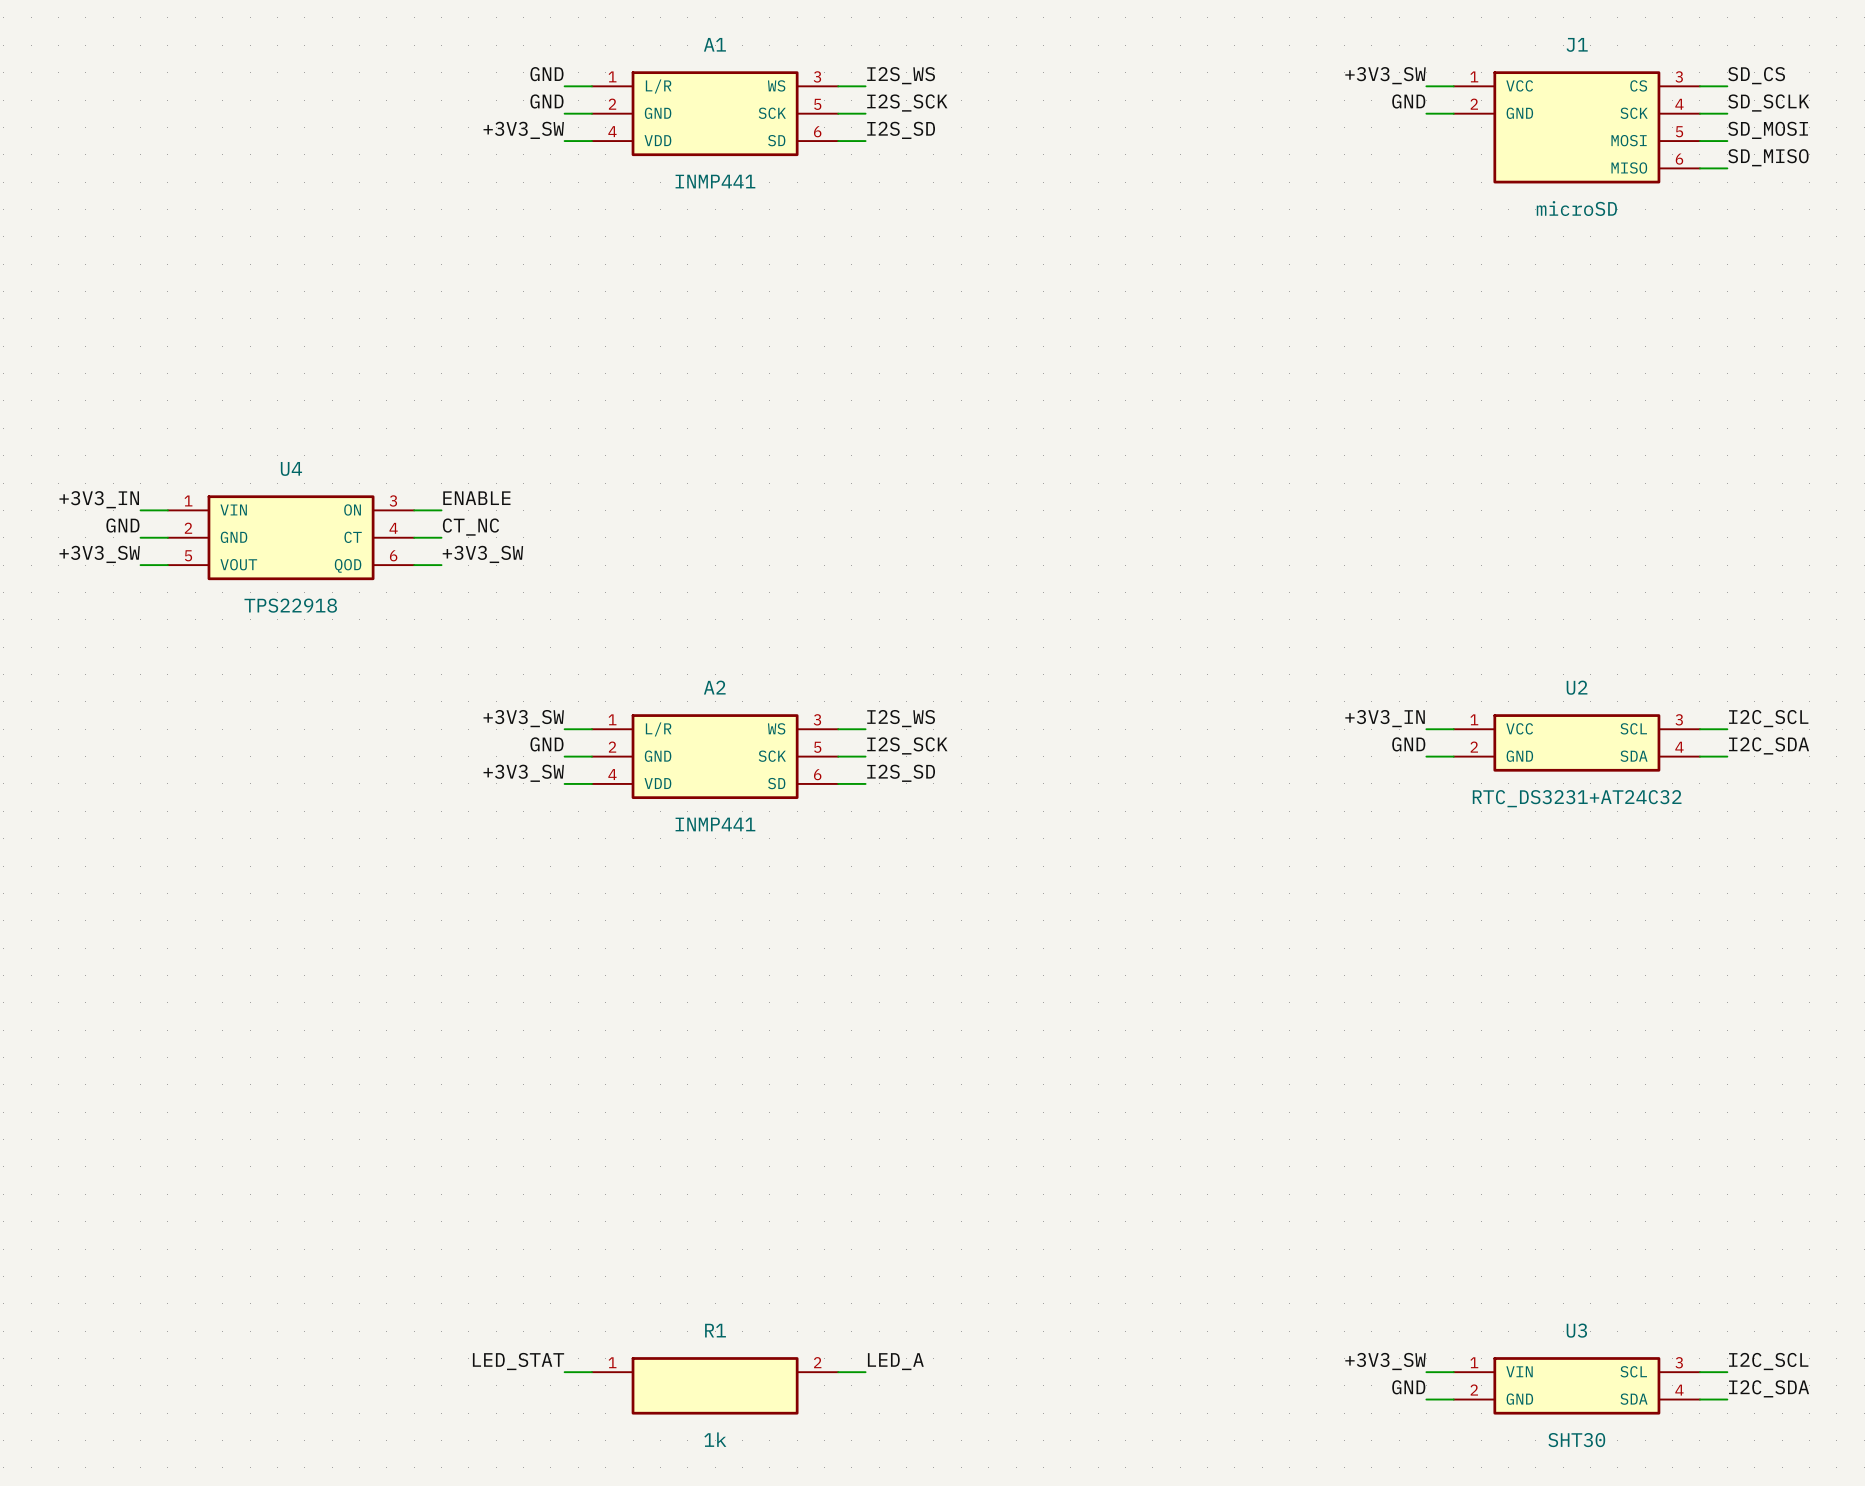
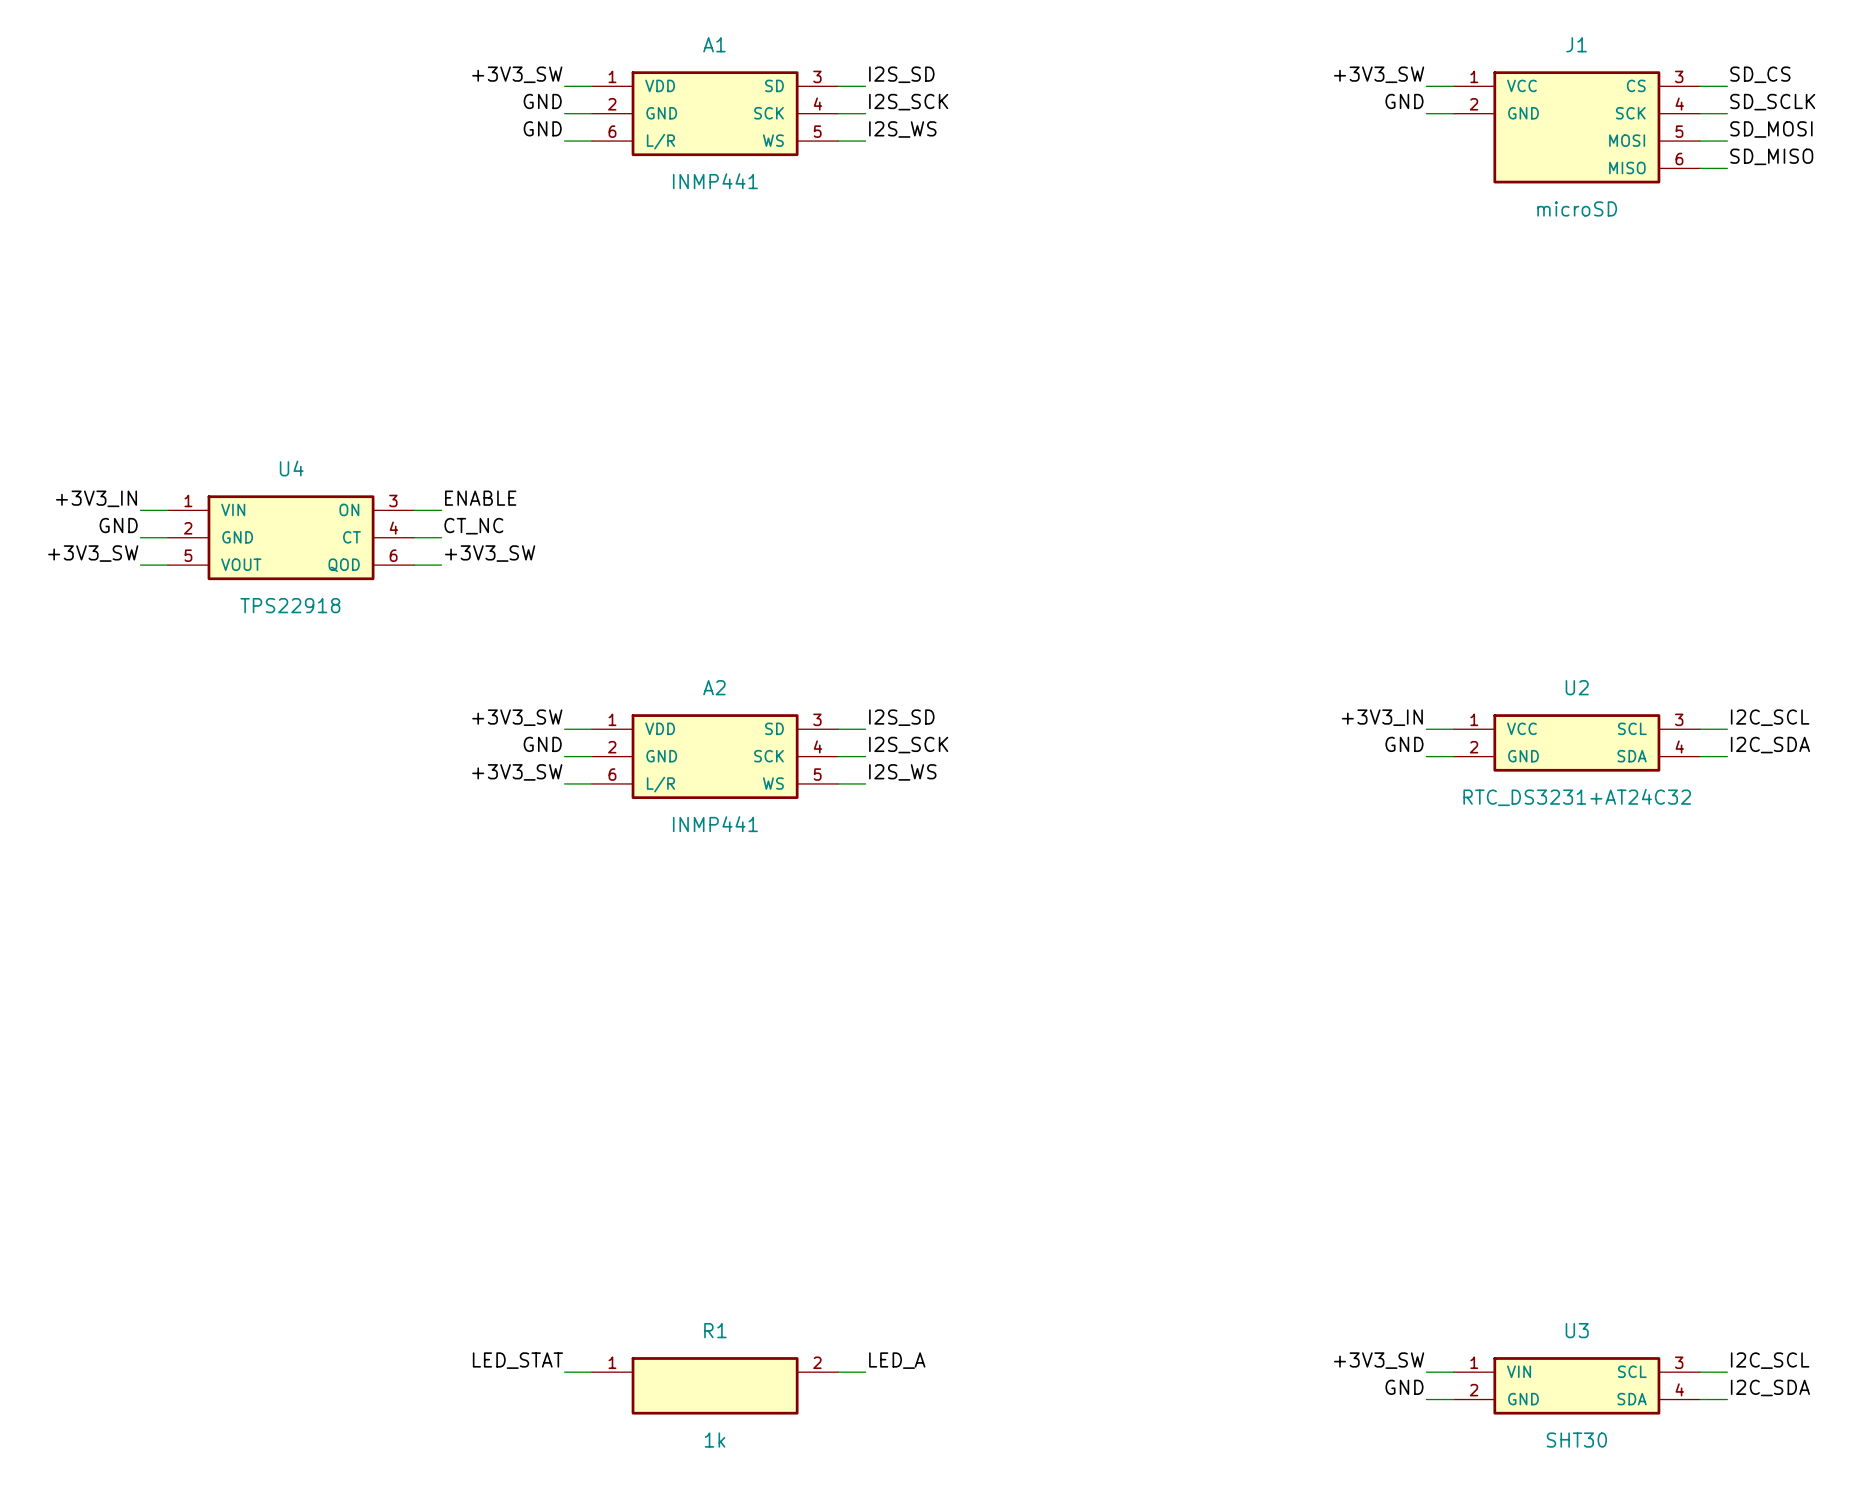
label: GND (546, 74) -> +3V3_SW (517, 74)
label: I2S_WS (901, 75) -> I2S_SD (901, 74)
A1 pin name: WS (776, 85) -> SD (774, 85)
A1 pin name: L/R (658, 86) -> VDD (660, 85)
A1 pin number: 5 (817, 104) -> 4 (817, 104)
label: +3V3_SW (523, 130) -> GND (542, 128)
label: I2S_SD (901, 130) -> I2S_WS (902, 129)
A1 pin number: 4 (612, 131) -> 6 (612, 131)
A1 pin number: 6 (817, 131) -> 5 (817, 131)
A1 pin name: VDD (657, 140) -> L/R (660, 141)
A1 pin name: SD (776, 140) -> WS (773, 140)
label: I2S_WS (901, 718) -> I2S_SD (901, 717)
A2 pin name: WS (776, 728) -> SD (774, 728)
A2 pin name: L/R (658, 729) -> VDD (660, 728)
A2 pin number: 5 (817, 747) -> 4 (817, 746)
label: I2S_SD (901, 773) -> I2S_WS (902, 772)
A2 pin number: 4 (612, 774) -> 6 (612, 774)
A2 pin number: 6 (817, 774) -> 5 (817, 774)
A2 pin name: VDD (657, 783) -> L/R (660, 784)
A2 pin name: SD (776, 783) -> WS (773, 783)

